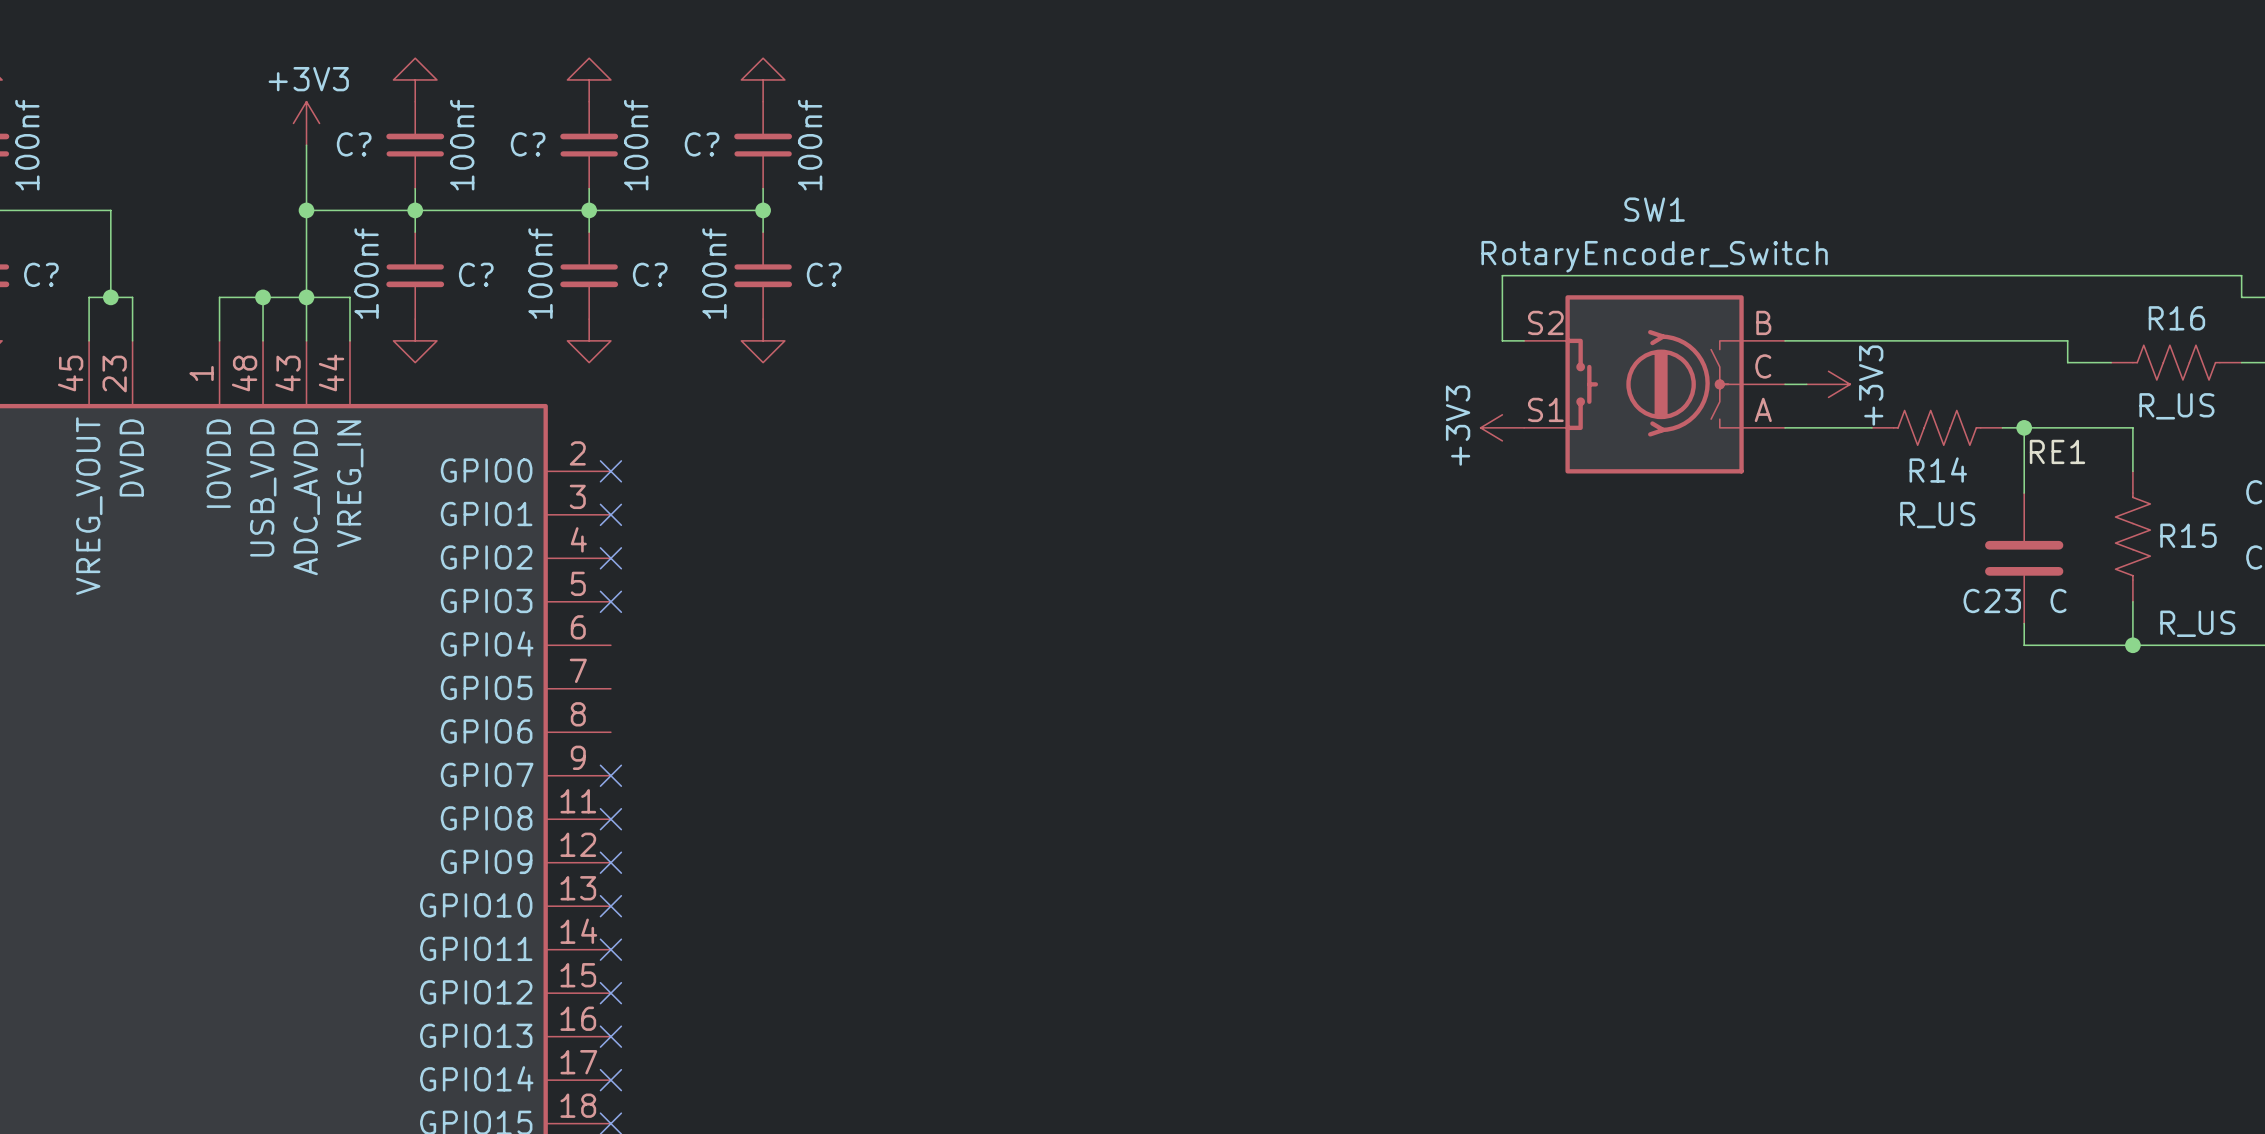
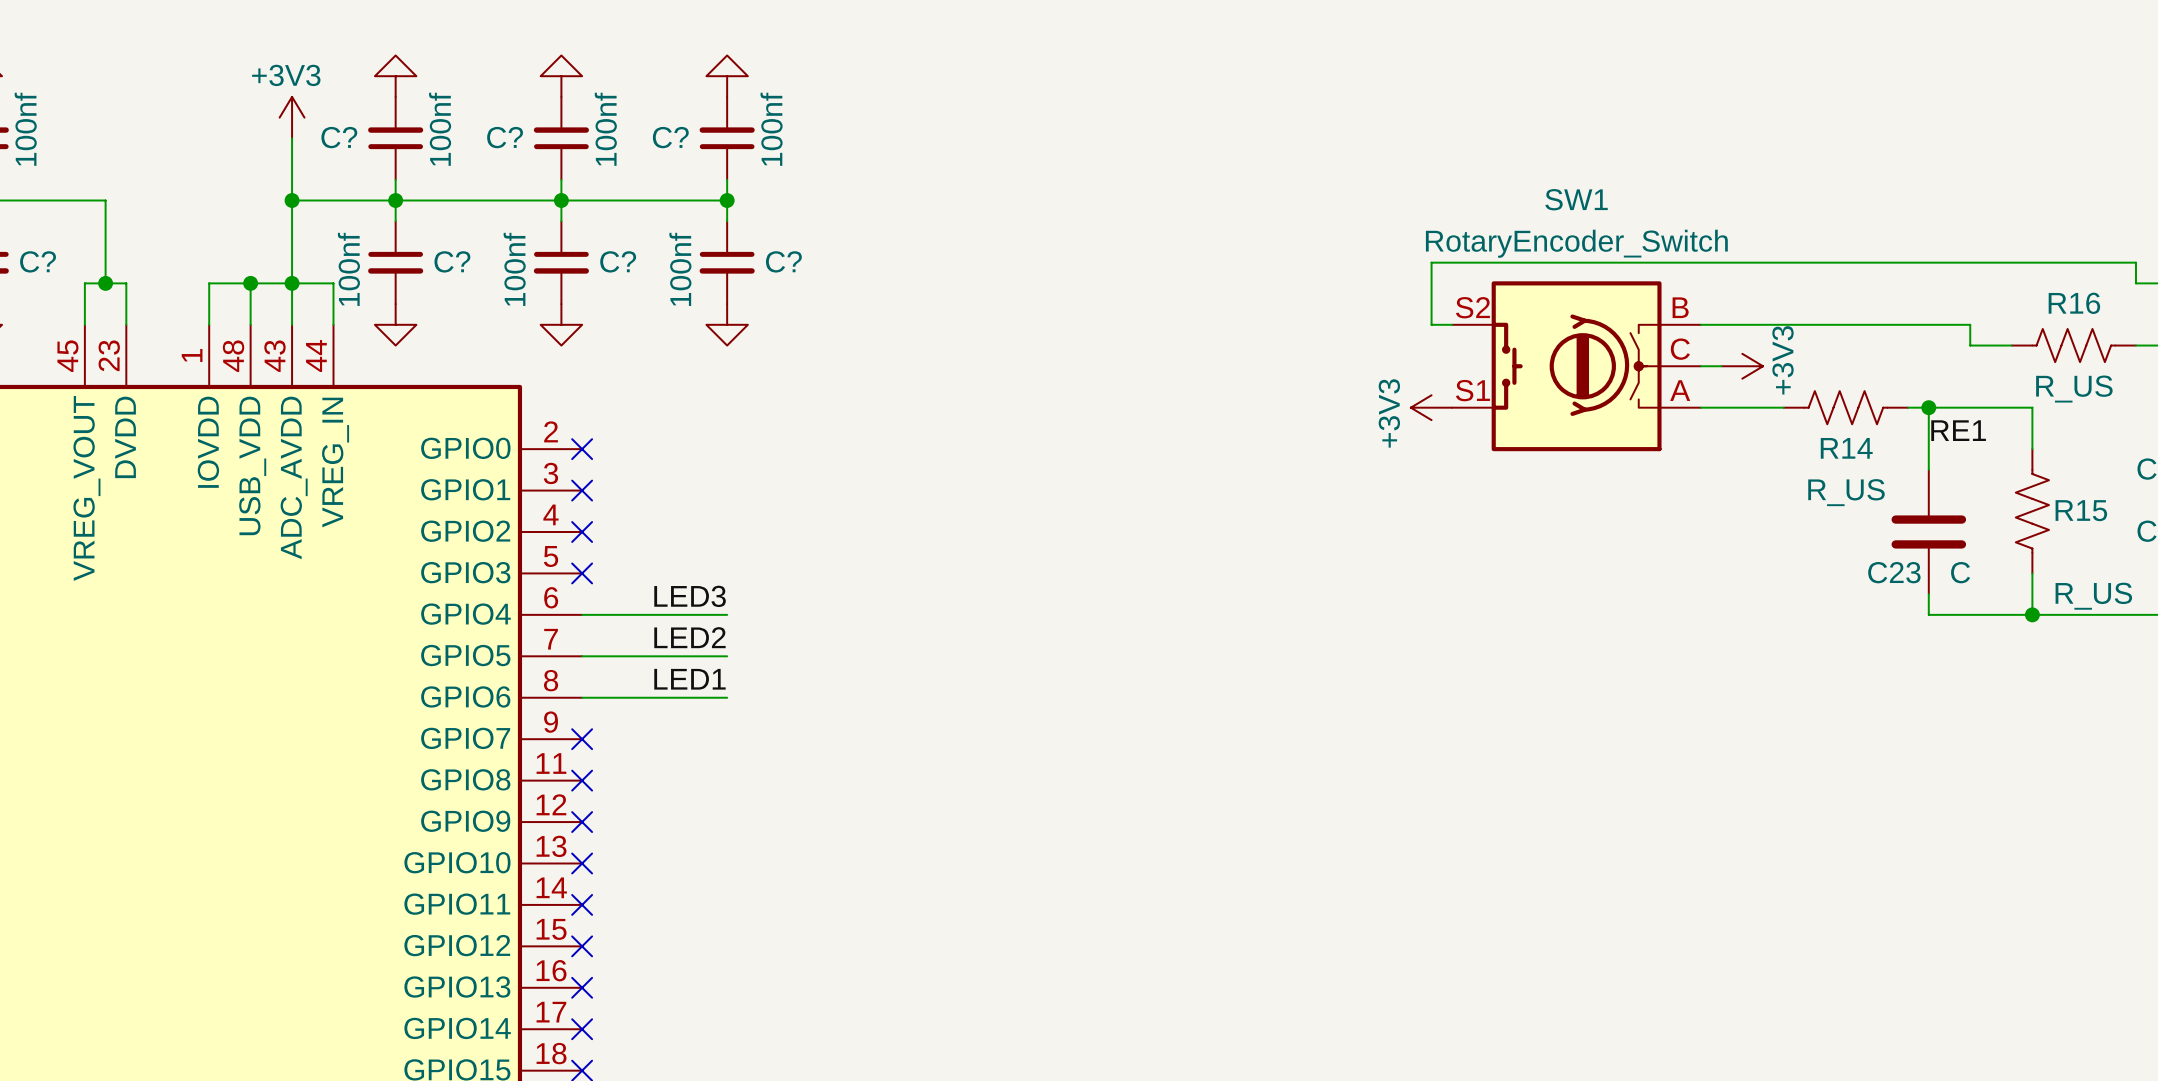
label: none -> LED3 (690, 596)
wire: none -> (582, 614) (727, 614)
label: none -> LED2 (689, 637)
wire: none -> (582, 656) (727, 656)
label: none -> LED1 (689, 679)
wire: none -> (582, 697) (727, 697)

